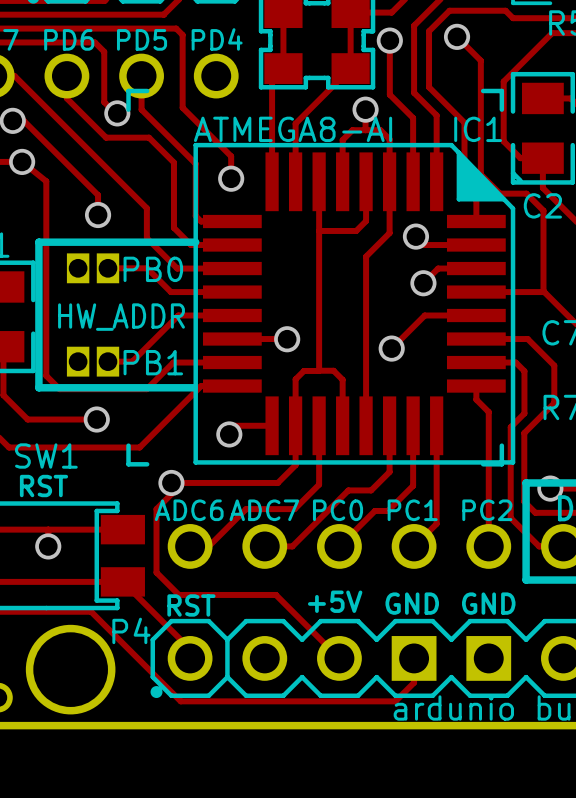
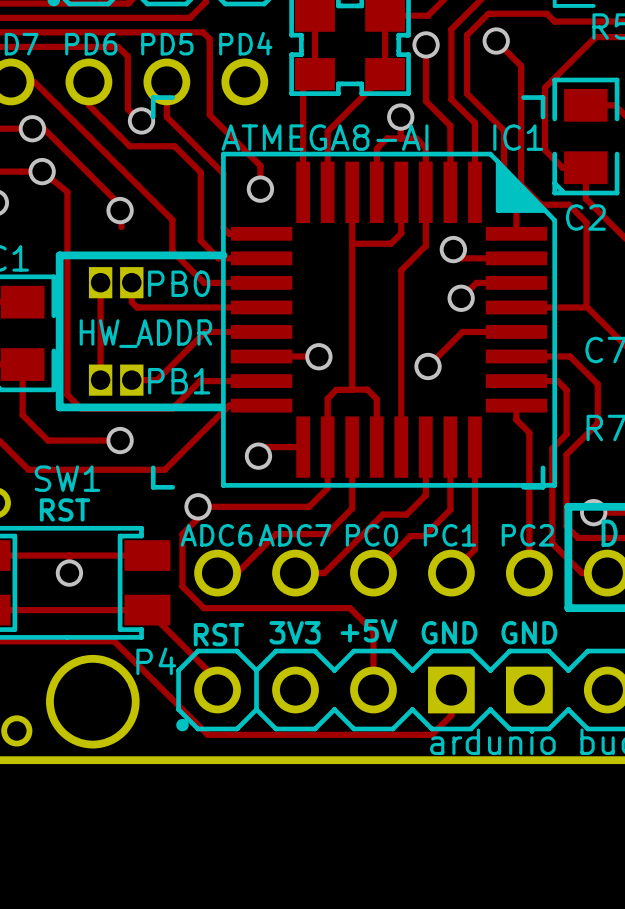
via position: (98, 215) -> (120, 210)
track: none -> (100, 282) (100, 380)
track: (107, 268) (147, 268) (170, 292) -> (131, 282) (131, 302) (137, 307) (197, 307)
track: (156, 559) (156, 572) (178, 594) (275, 594) (339, 658) -> (182, 586) (203, 608) (350, 608) (373, 631) (373, 690)
text: none -> 3V3 (295, 632)

